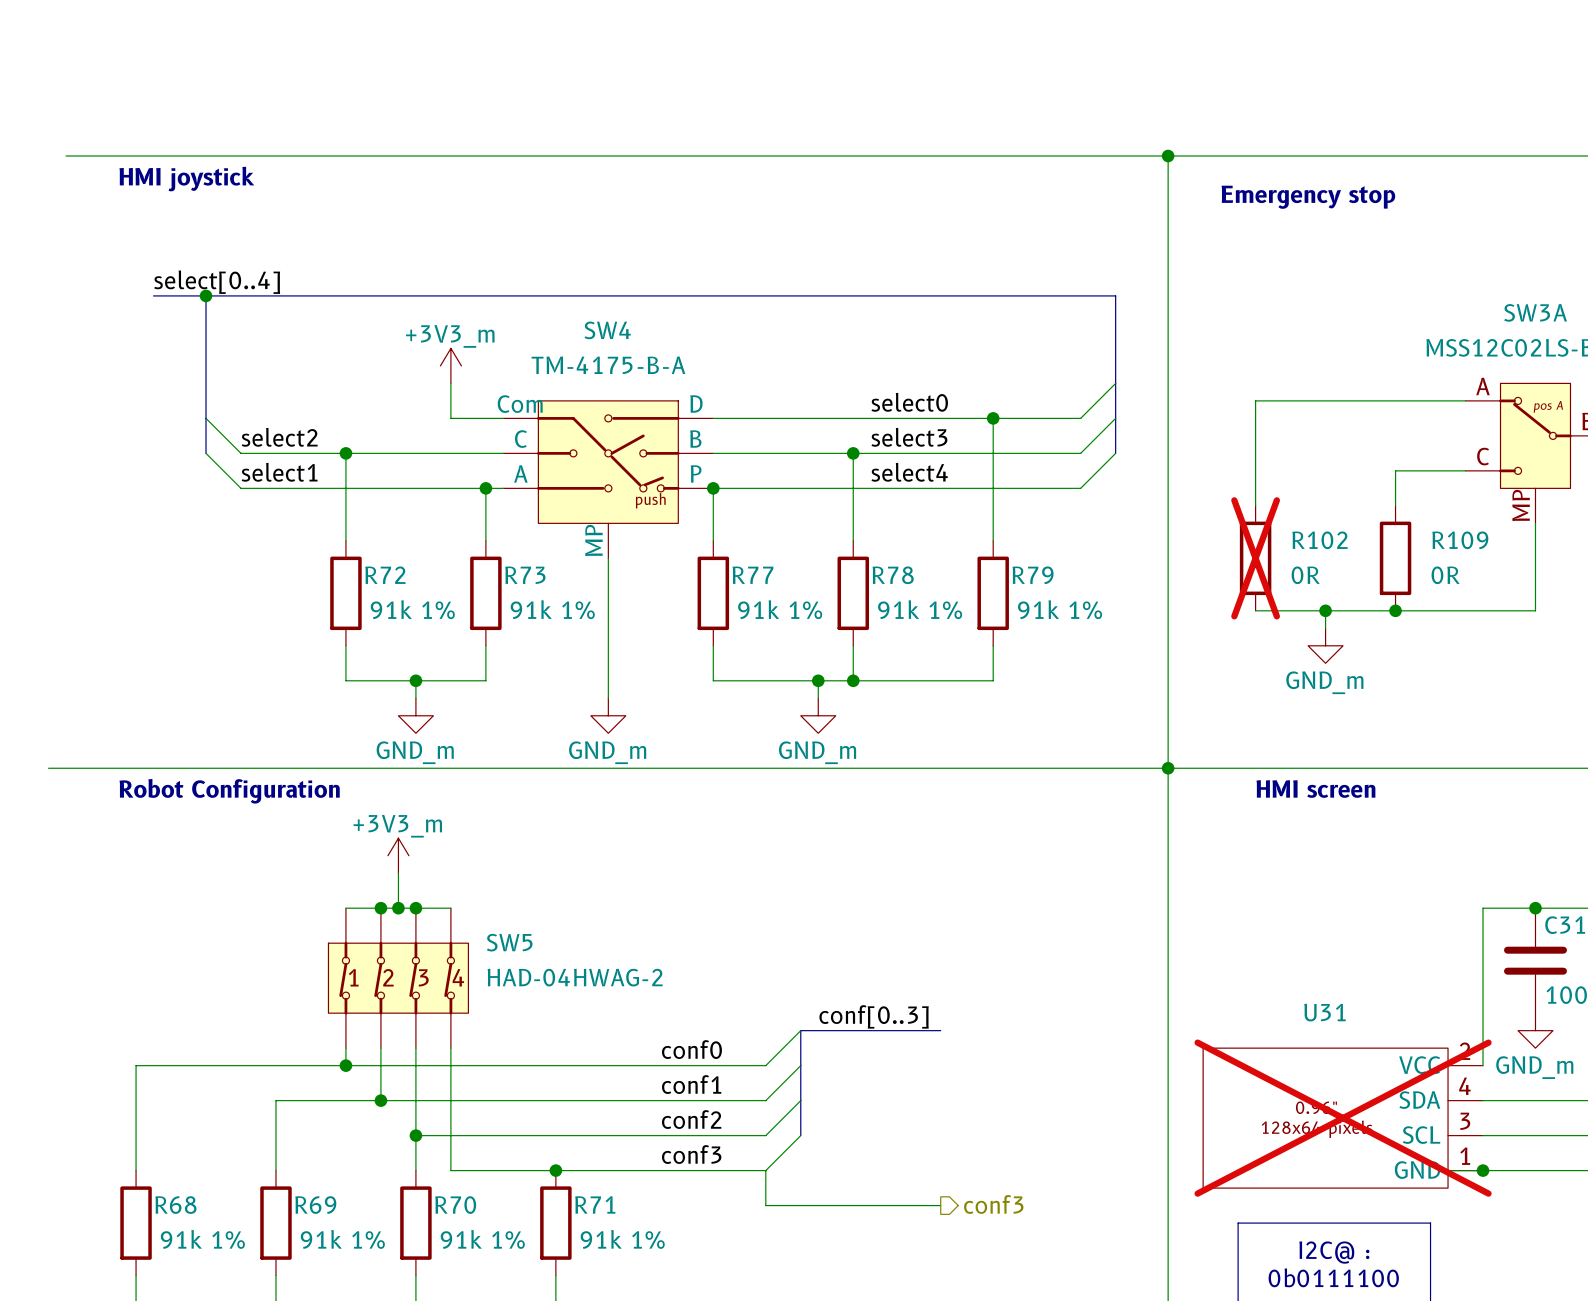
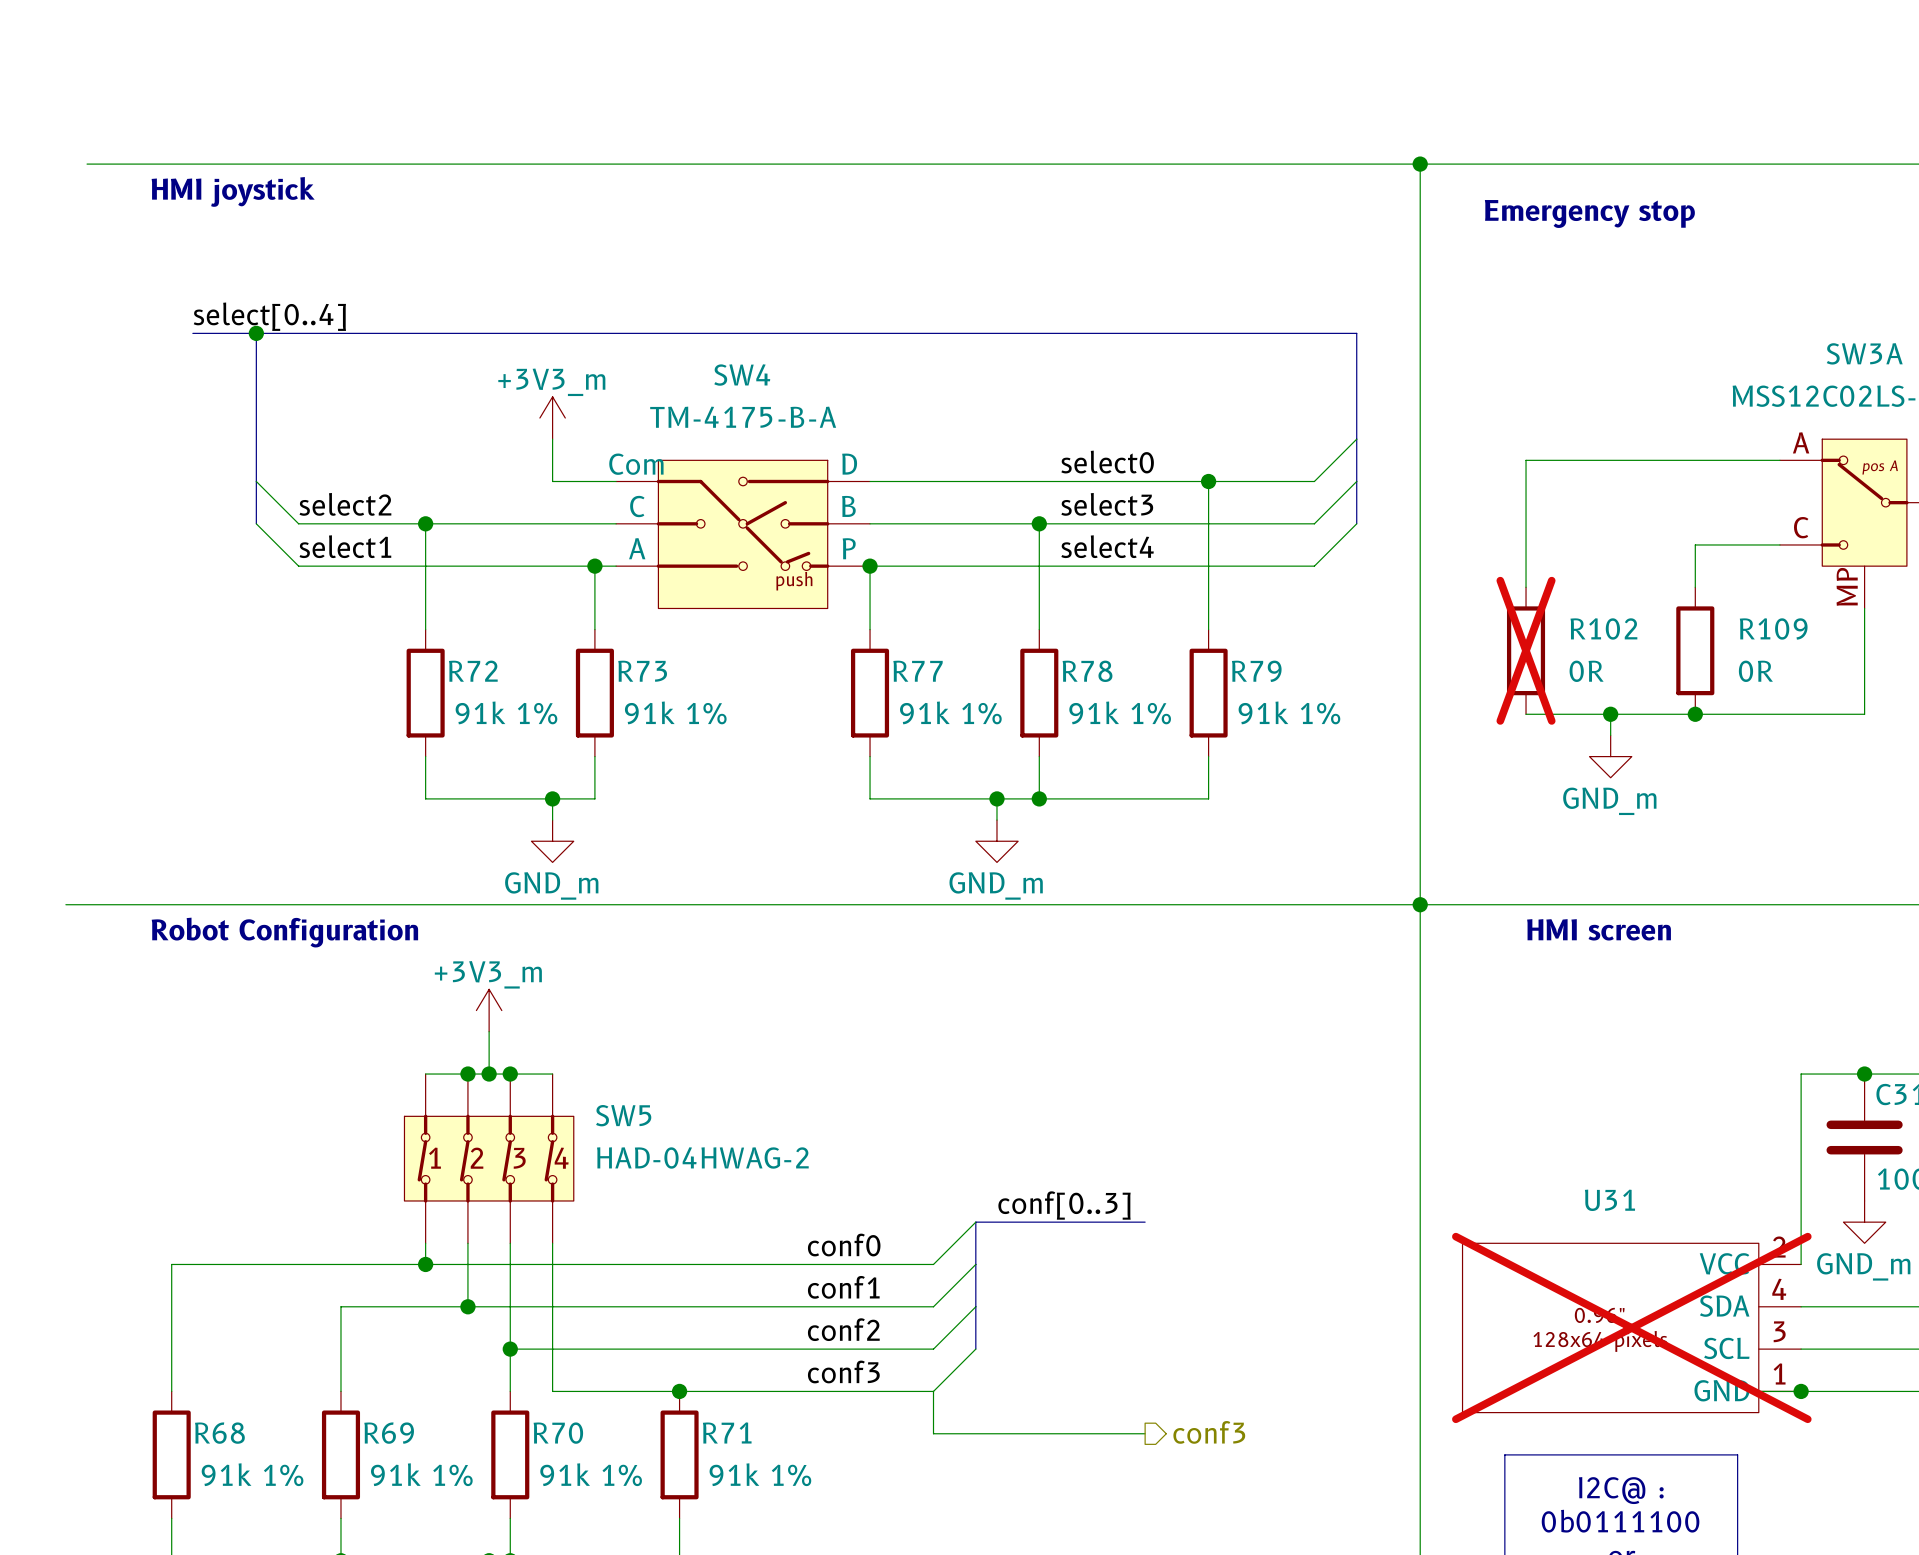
SW4 symbol: [503, 400, 714, 559] -> [616, 460, 871, 609]
wire: (608, 558) (608, 698) -> none
wire: (415, 680) (415, 698) -> (552, 798) (552, 820)
junction position: (415, 680) -> (552, 798)
power symbol position: GND_m (415, 715) -> GND_m (552, 841)
power symbol: GND_m (608, 715) -> none

